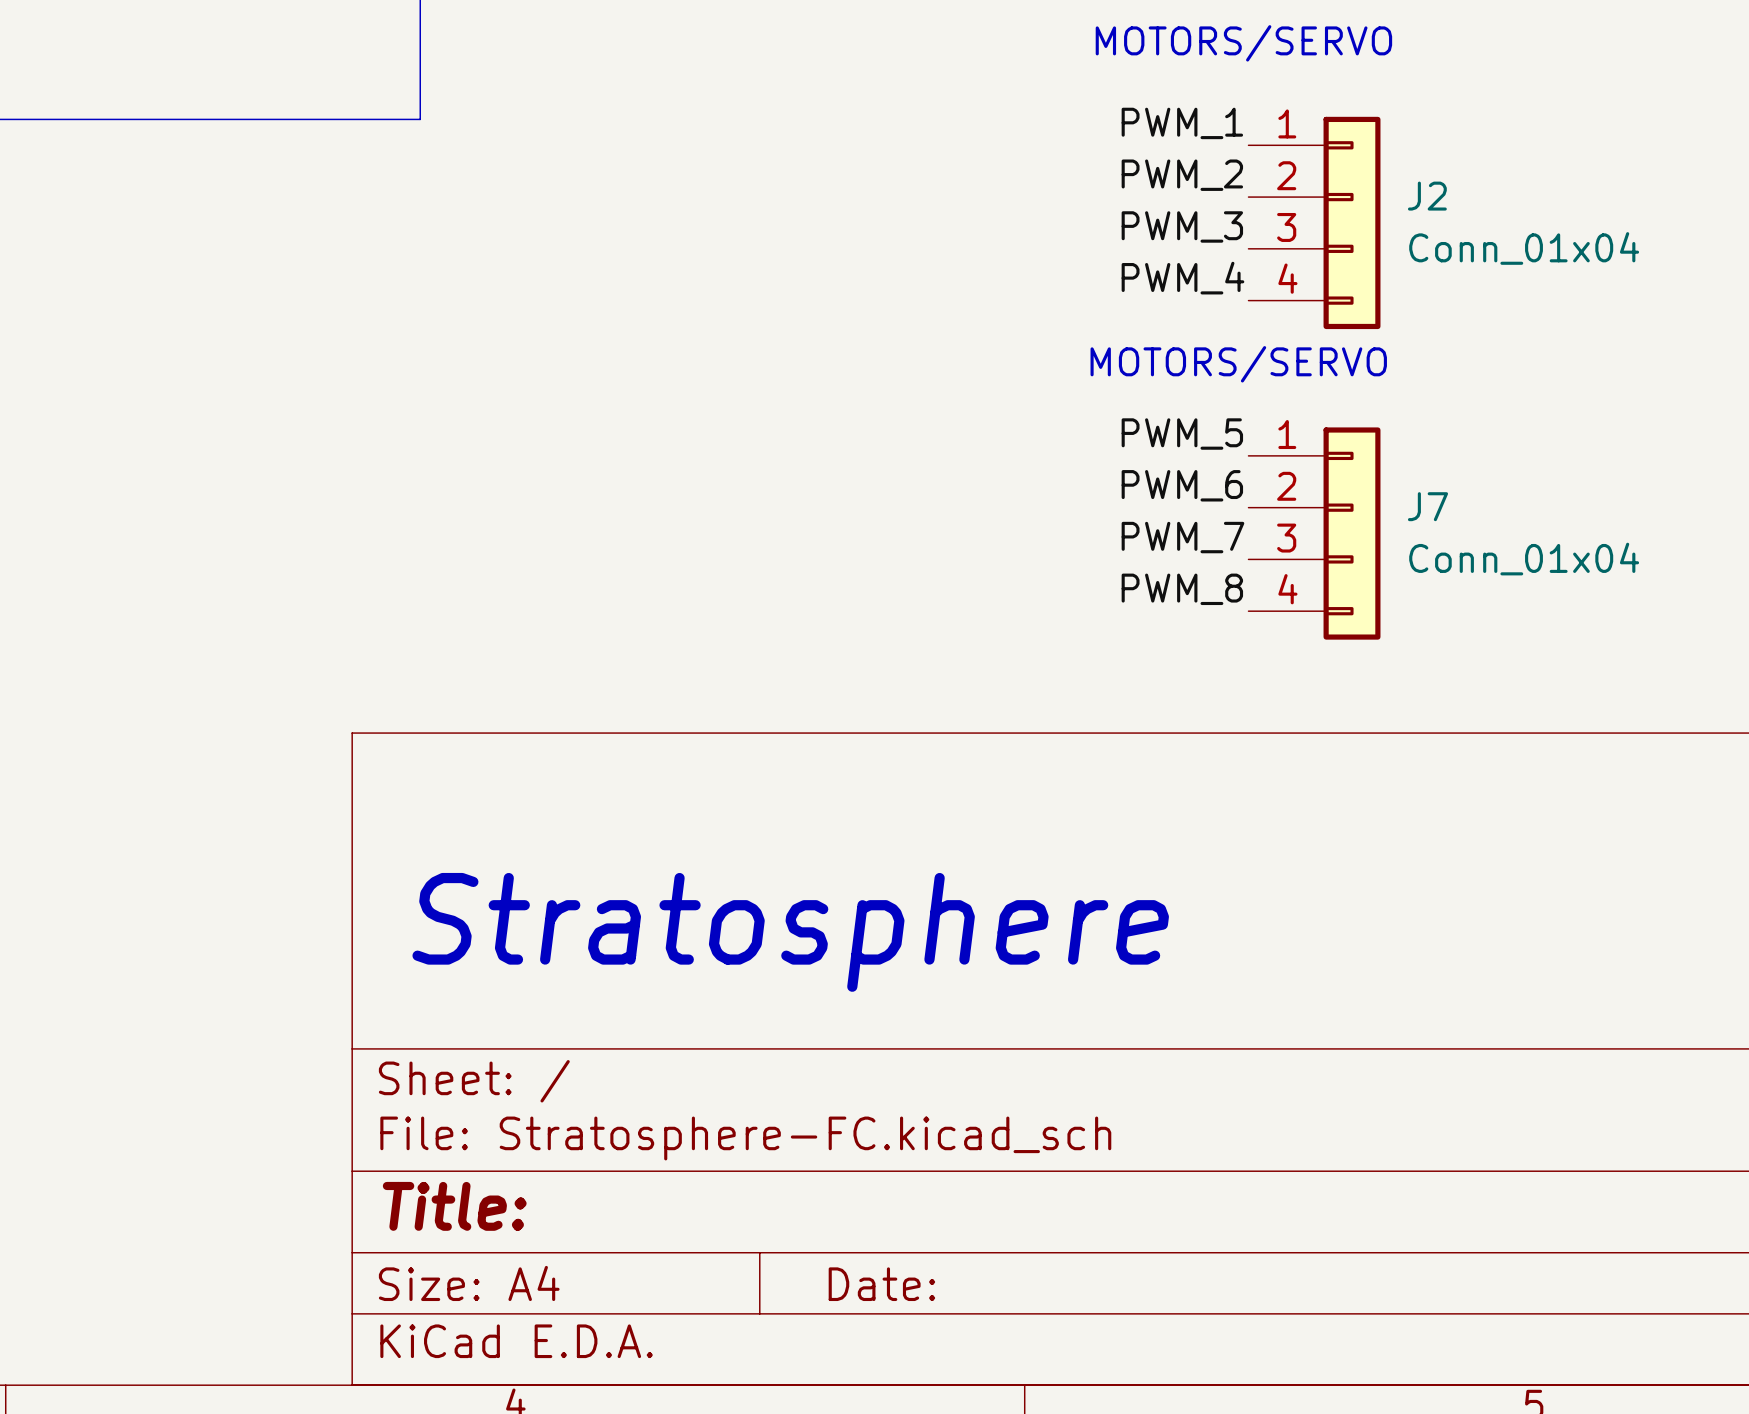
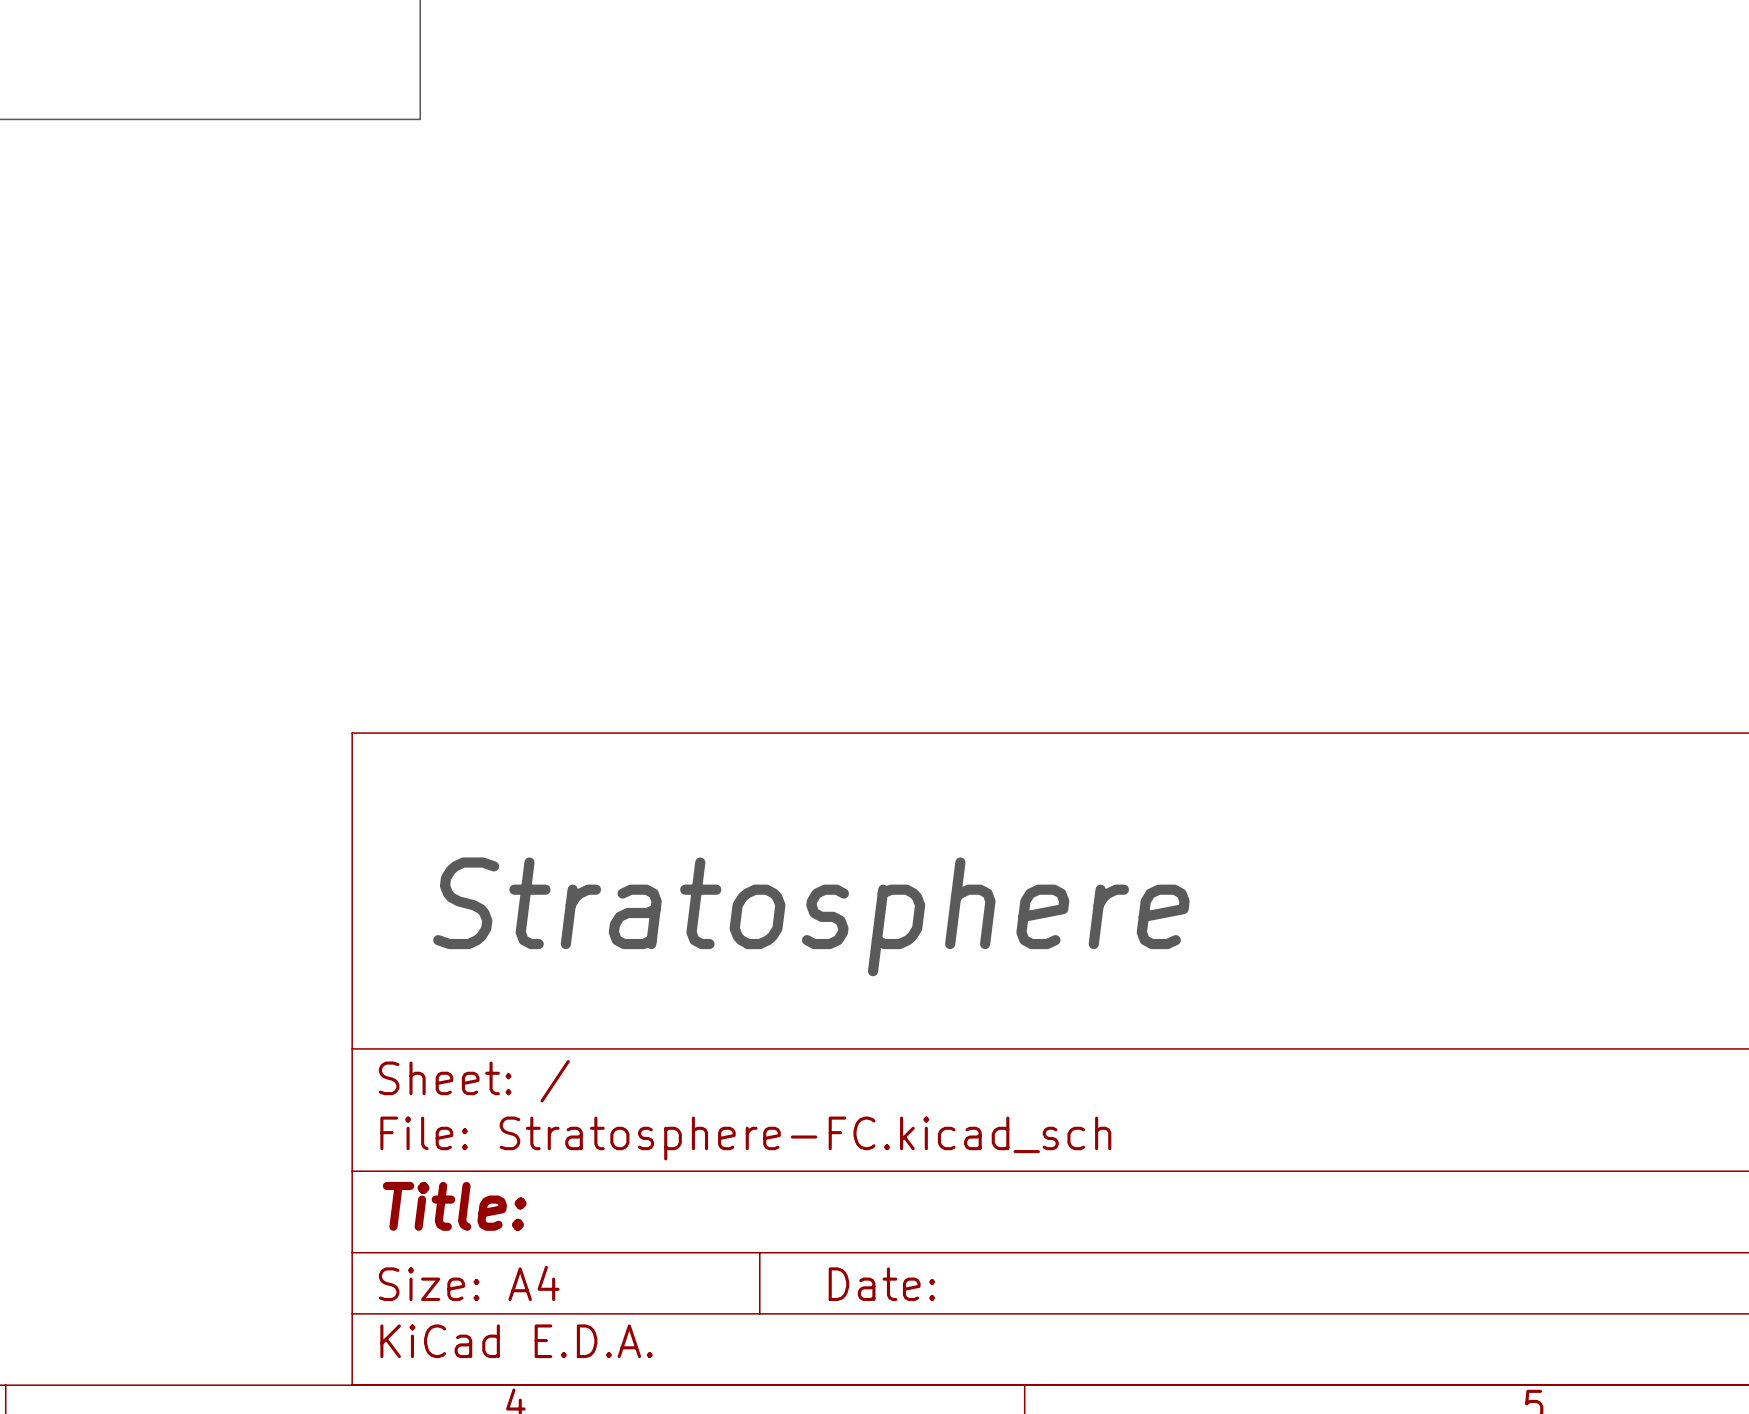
text: MOTORS/SERVO (1243, 43) -> none
label: PWM_1 (1182, 123) -> none
label: PWM_2 (1182, 175) -> none
J2: Conn_01x04 (1314, 222) -> none
label: PWM_3 (1182, 226) -> none
label: PWM_4 (1182, 278) -> none
text: MOTORS/SERVO (1238, 364) -> none
label: PWM_5 (1182, 434) -> none
label: PWM_6 (1182, 485) -> none
J7: Conn_01x04 (1314, 533) -> none
label: PWM_7 (1182, 537) -> none
label: PWM_8 (1182, 589) -> none
text position: Stratosphere (790, 932) -> Stratosphere (811, 916)

